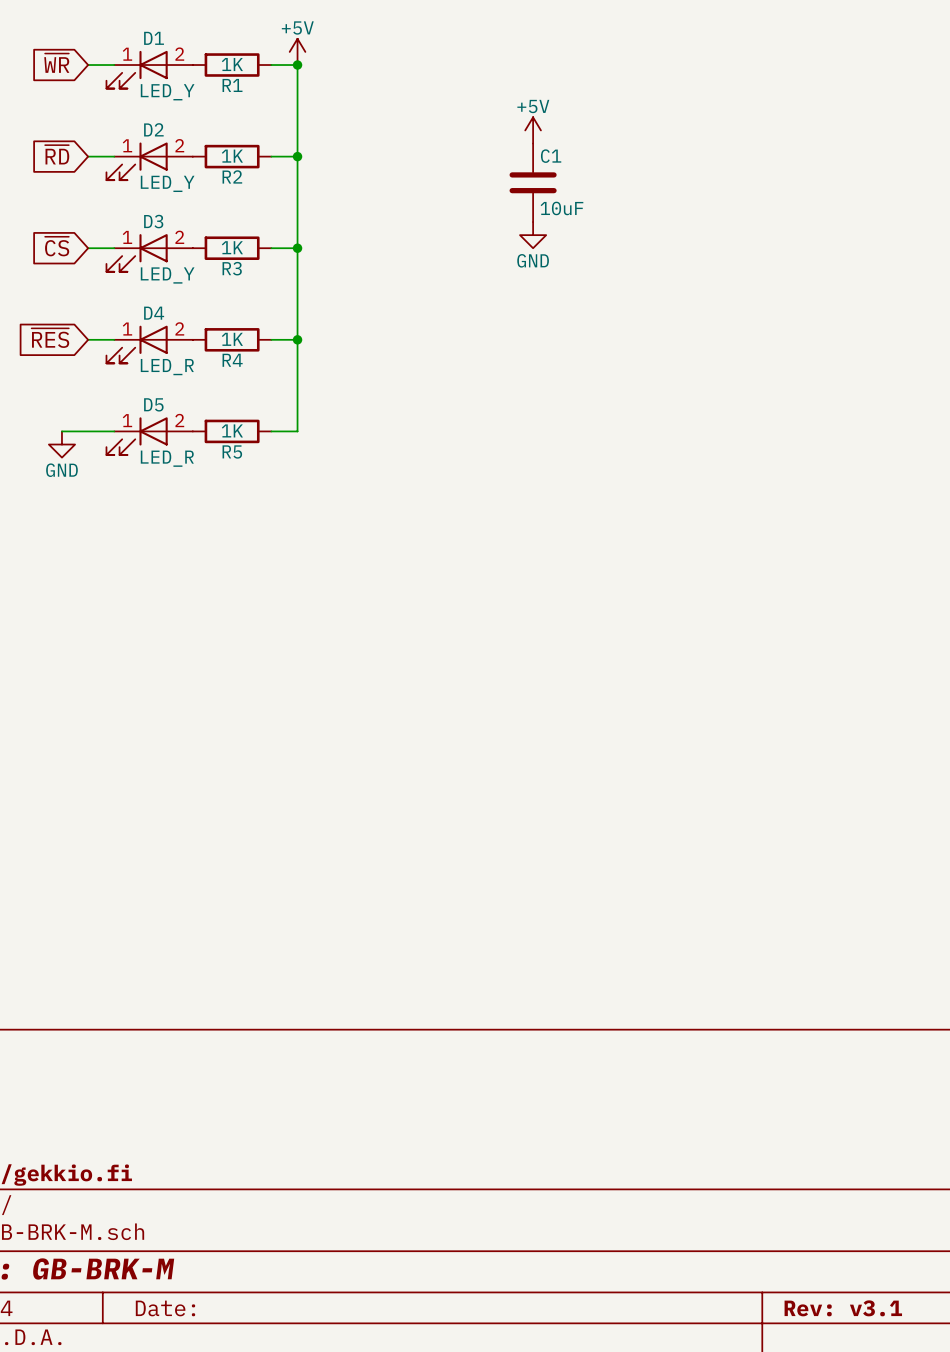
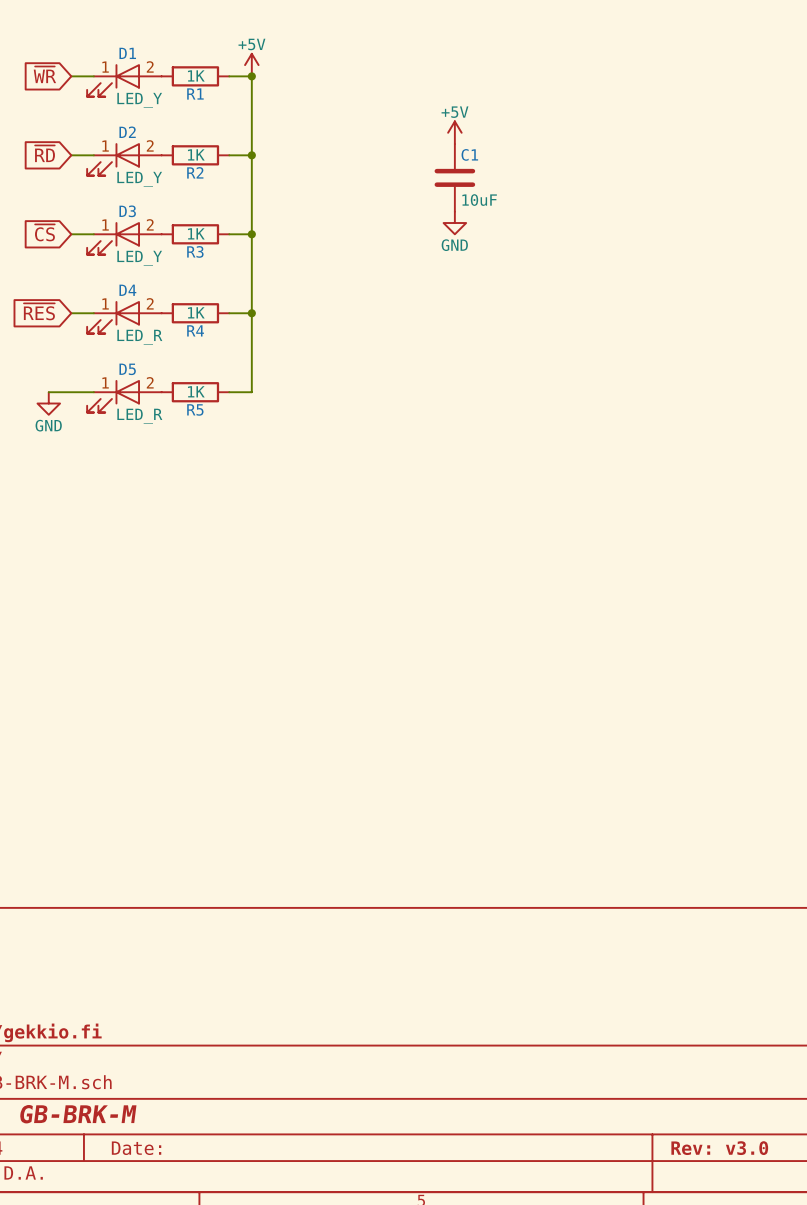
title block: Rev: v3.1 (843, 1308) -> Rev: v3.0 (719, 1148)

